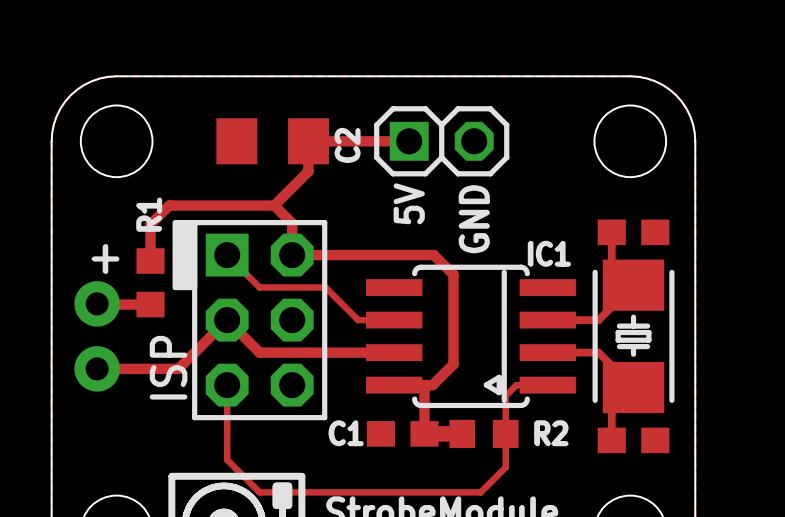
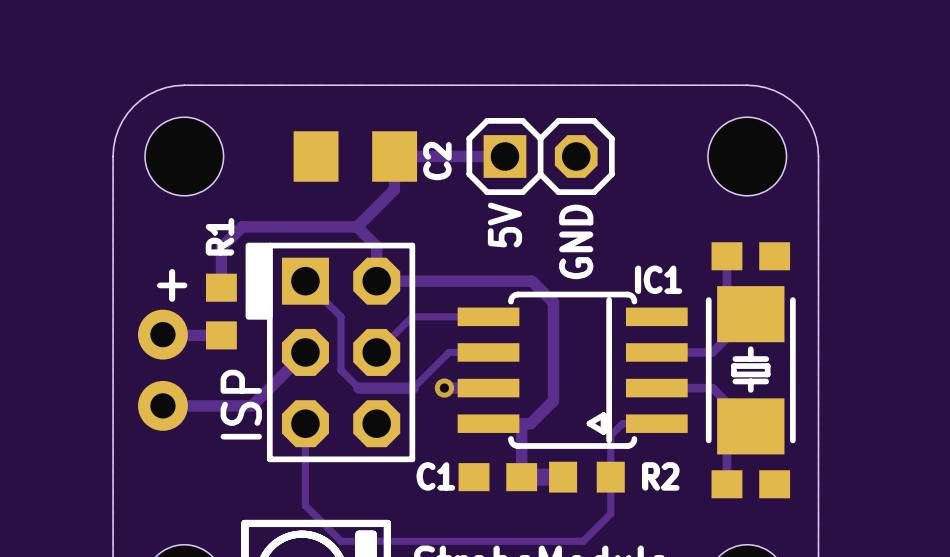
track: (259, 287) (325, 287) (358, 320) -> none
track: none -> (488, 316) (412, 316) (376, 352)
track: (227, 320) (259, 352) (275, 352) -> (340, 316) (340, 370) (358, 388)
track: (325, 352) (353, 352) -> (413, 388) (449, 352)
via: none -> (444, 388)

